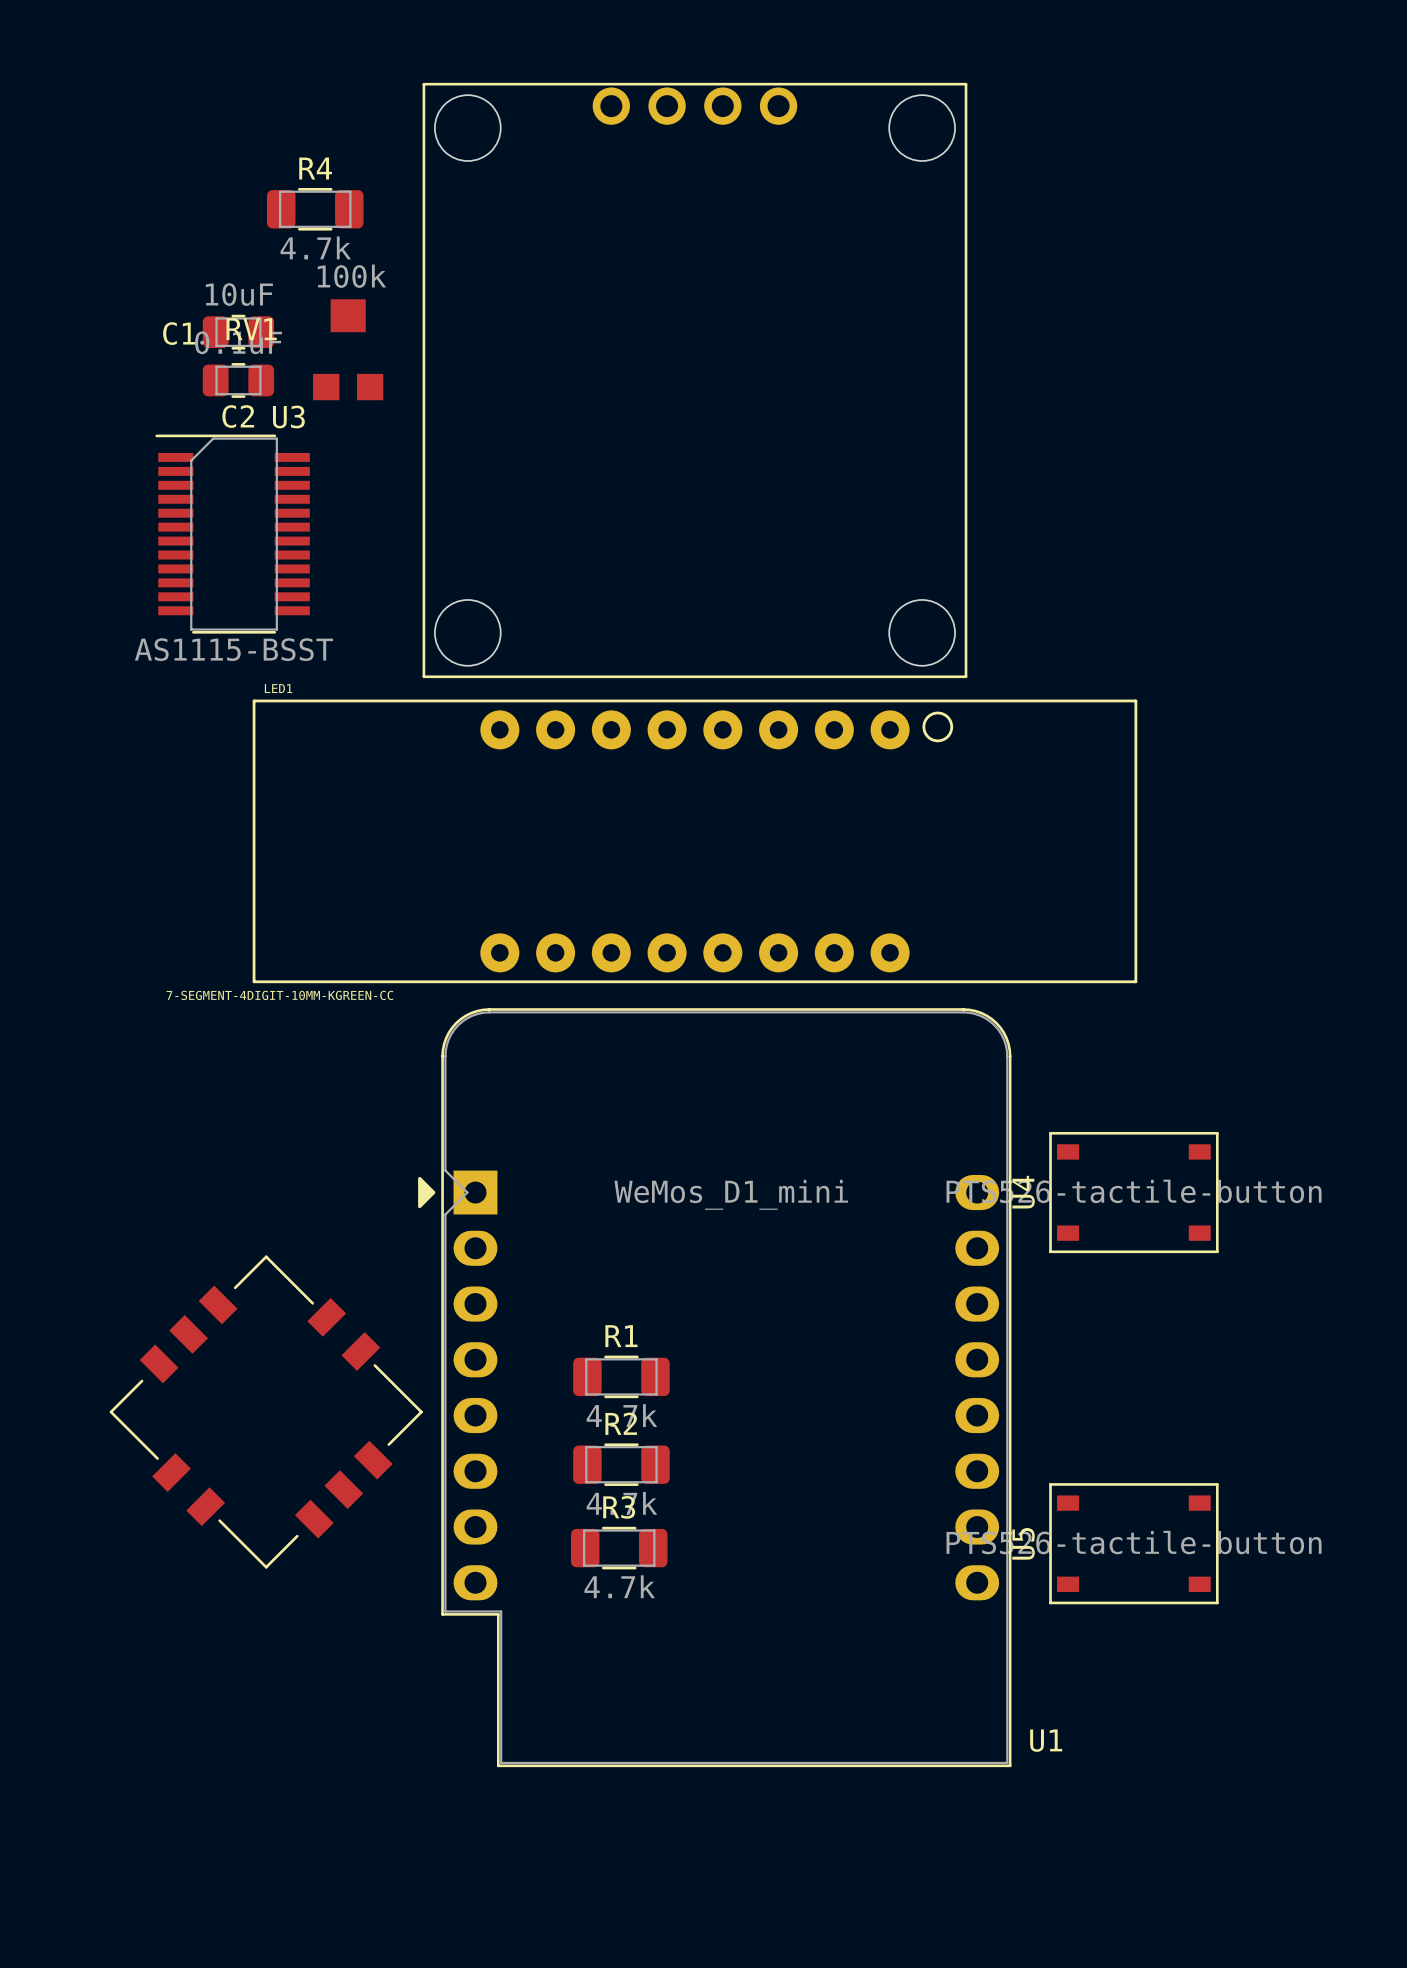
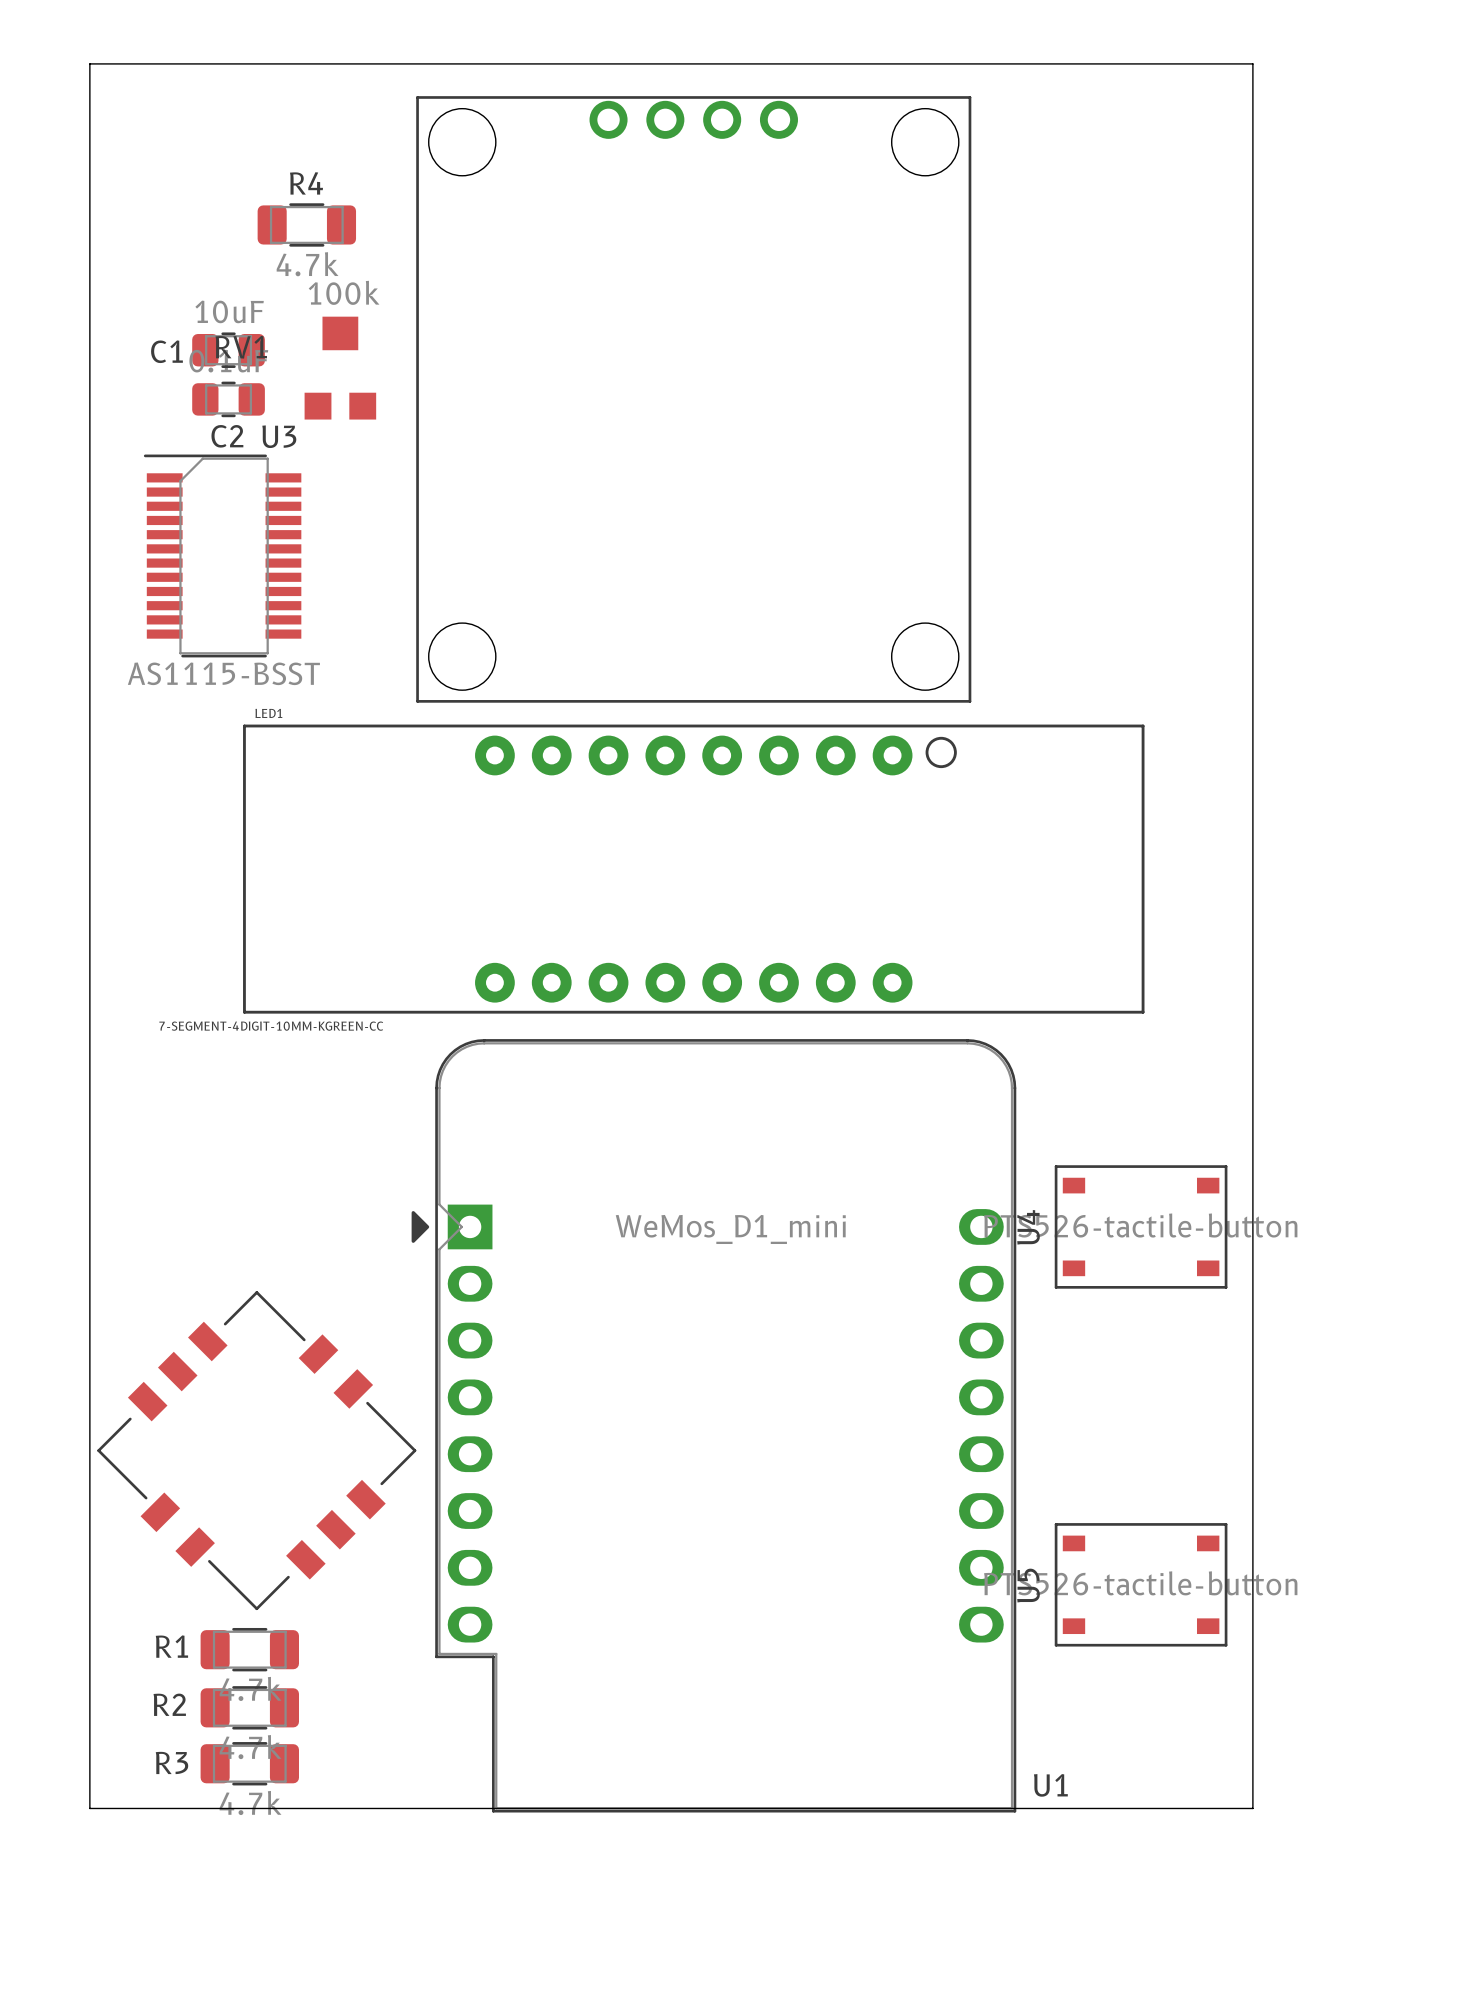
board edge: none -> (89, 63) (1252, 63) (1252, 1808) (89, 1808) (89, 63)
R1 name position: R1 (621, 1336) -> R1 (171, 1646)
R1 position: (621, 1376) -> (249, 1649)
R2 name position: R2 (621, 1423) -> R2 (169, 1704)
R2 position: (621, 1464) -> (249, 1707)
R3 name position: R3 (619, 1507) -> R3 (171, 1762)
R3 position: (619, 1548) -> (249, 1763)

